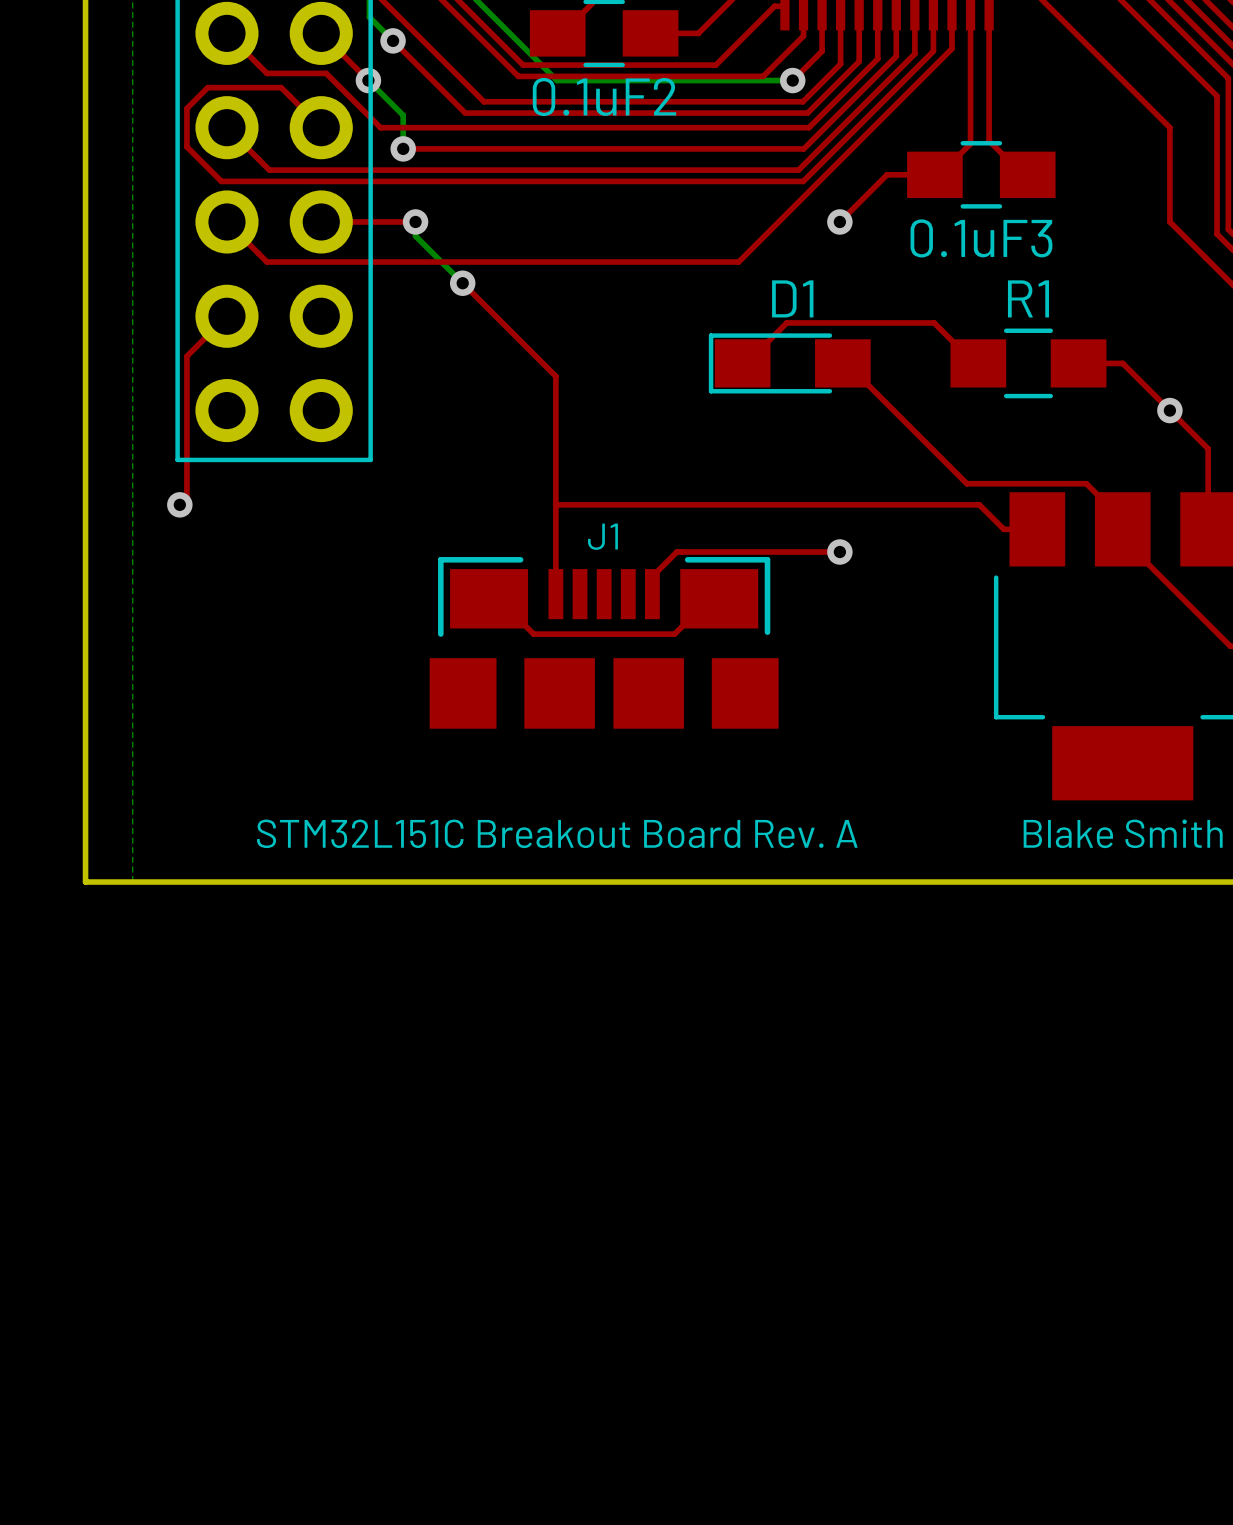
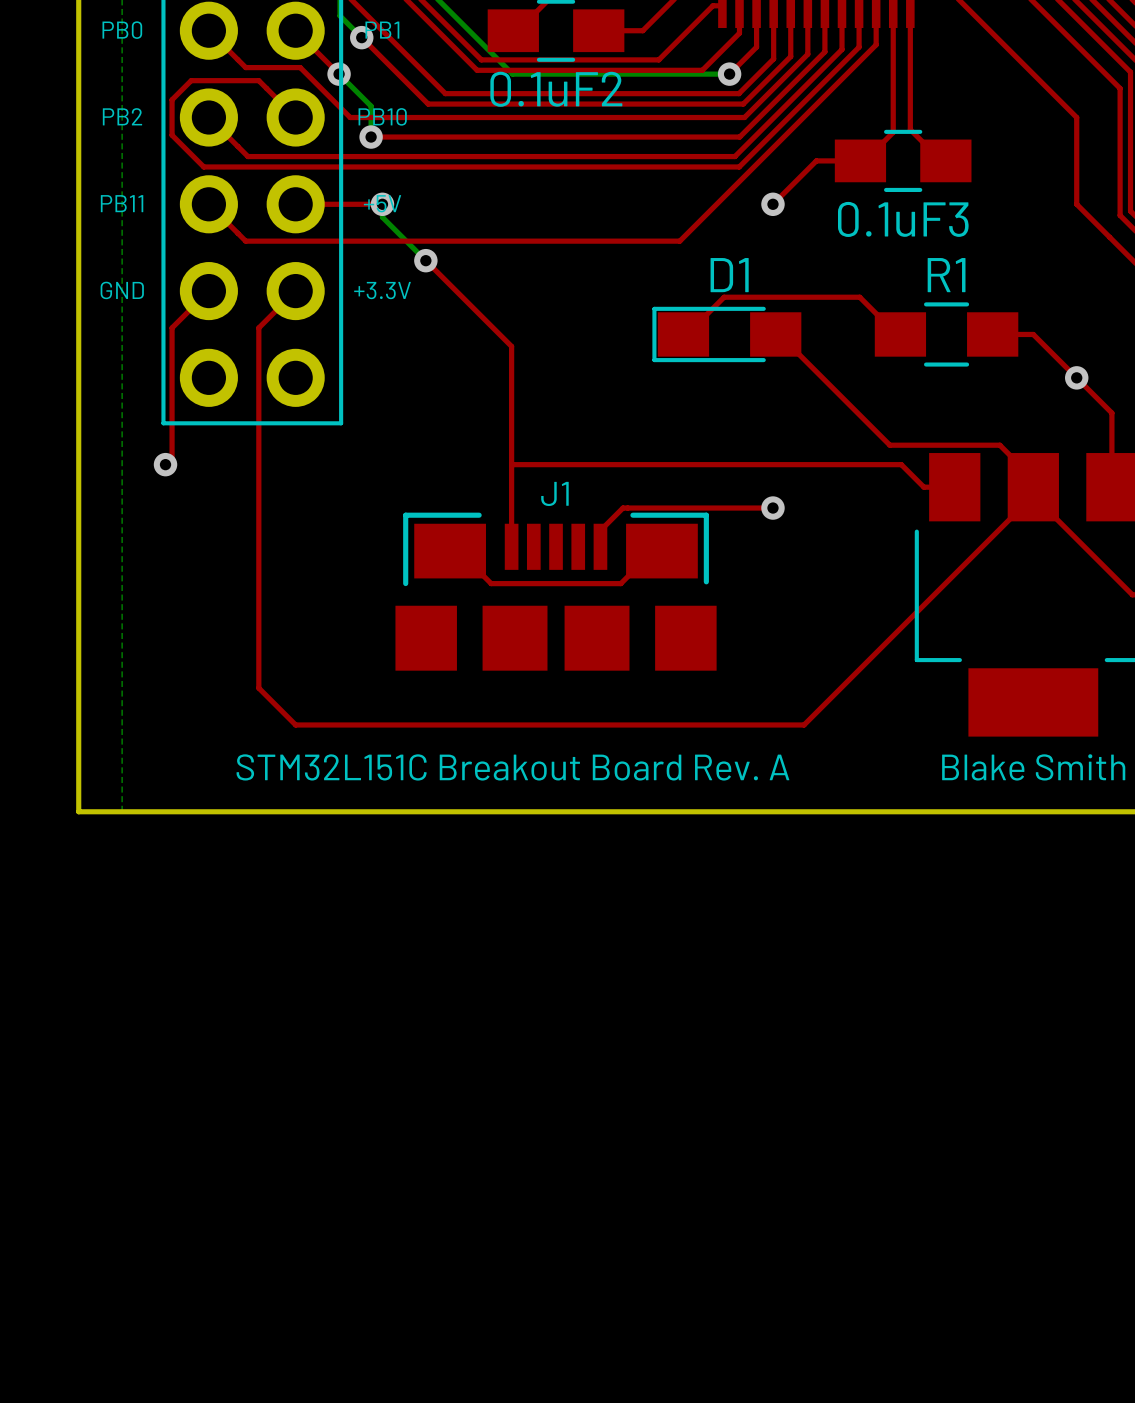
text: none -> PB0 (122, 30)
text: none -> PB1 (382, 30)
text: none -> PB2 (122, 116)
text: none -> PB10 (382, 116)
text: none -> PB11 (122, 203)
text: none -> +5V (382, 203)
text: none -> GND (122, 290)
text: none -> +3.3V (382, 290)
top track: none -> (295, 291) (258, 327) (258, 688) (295, 724) (804, 724) (1033, 495)

